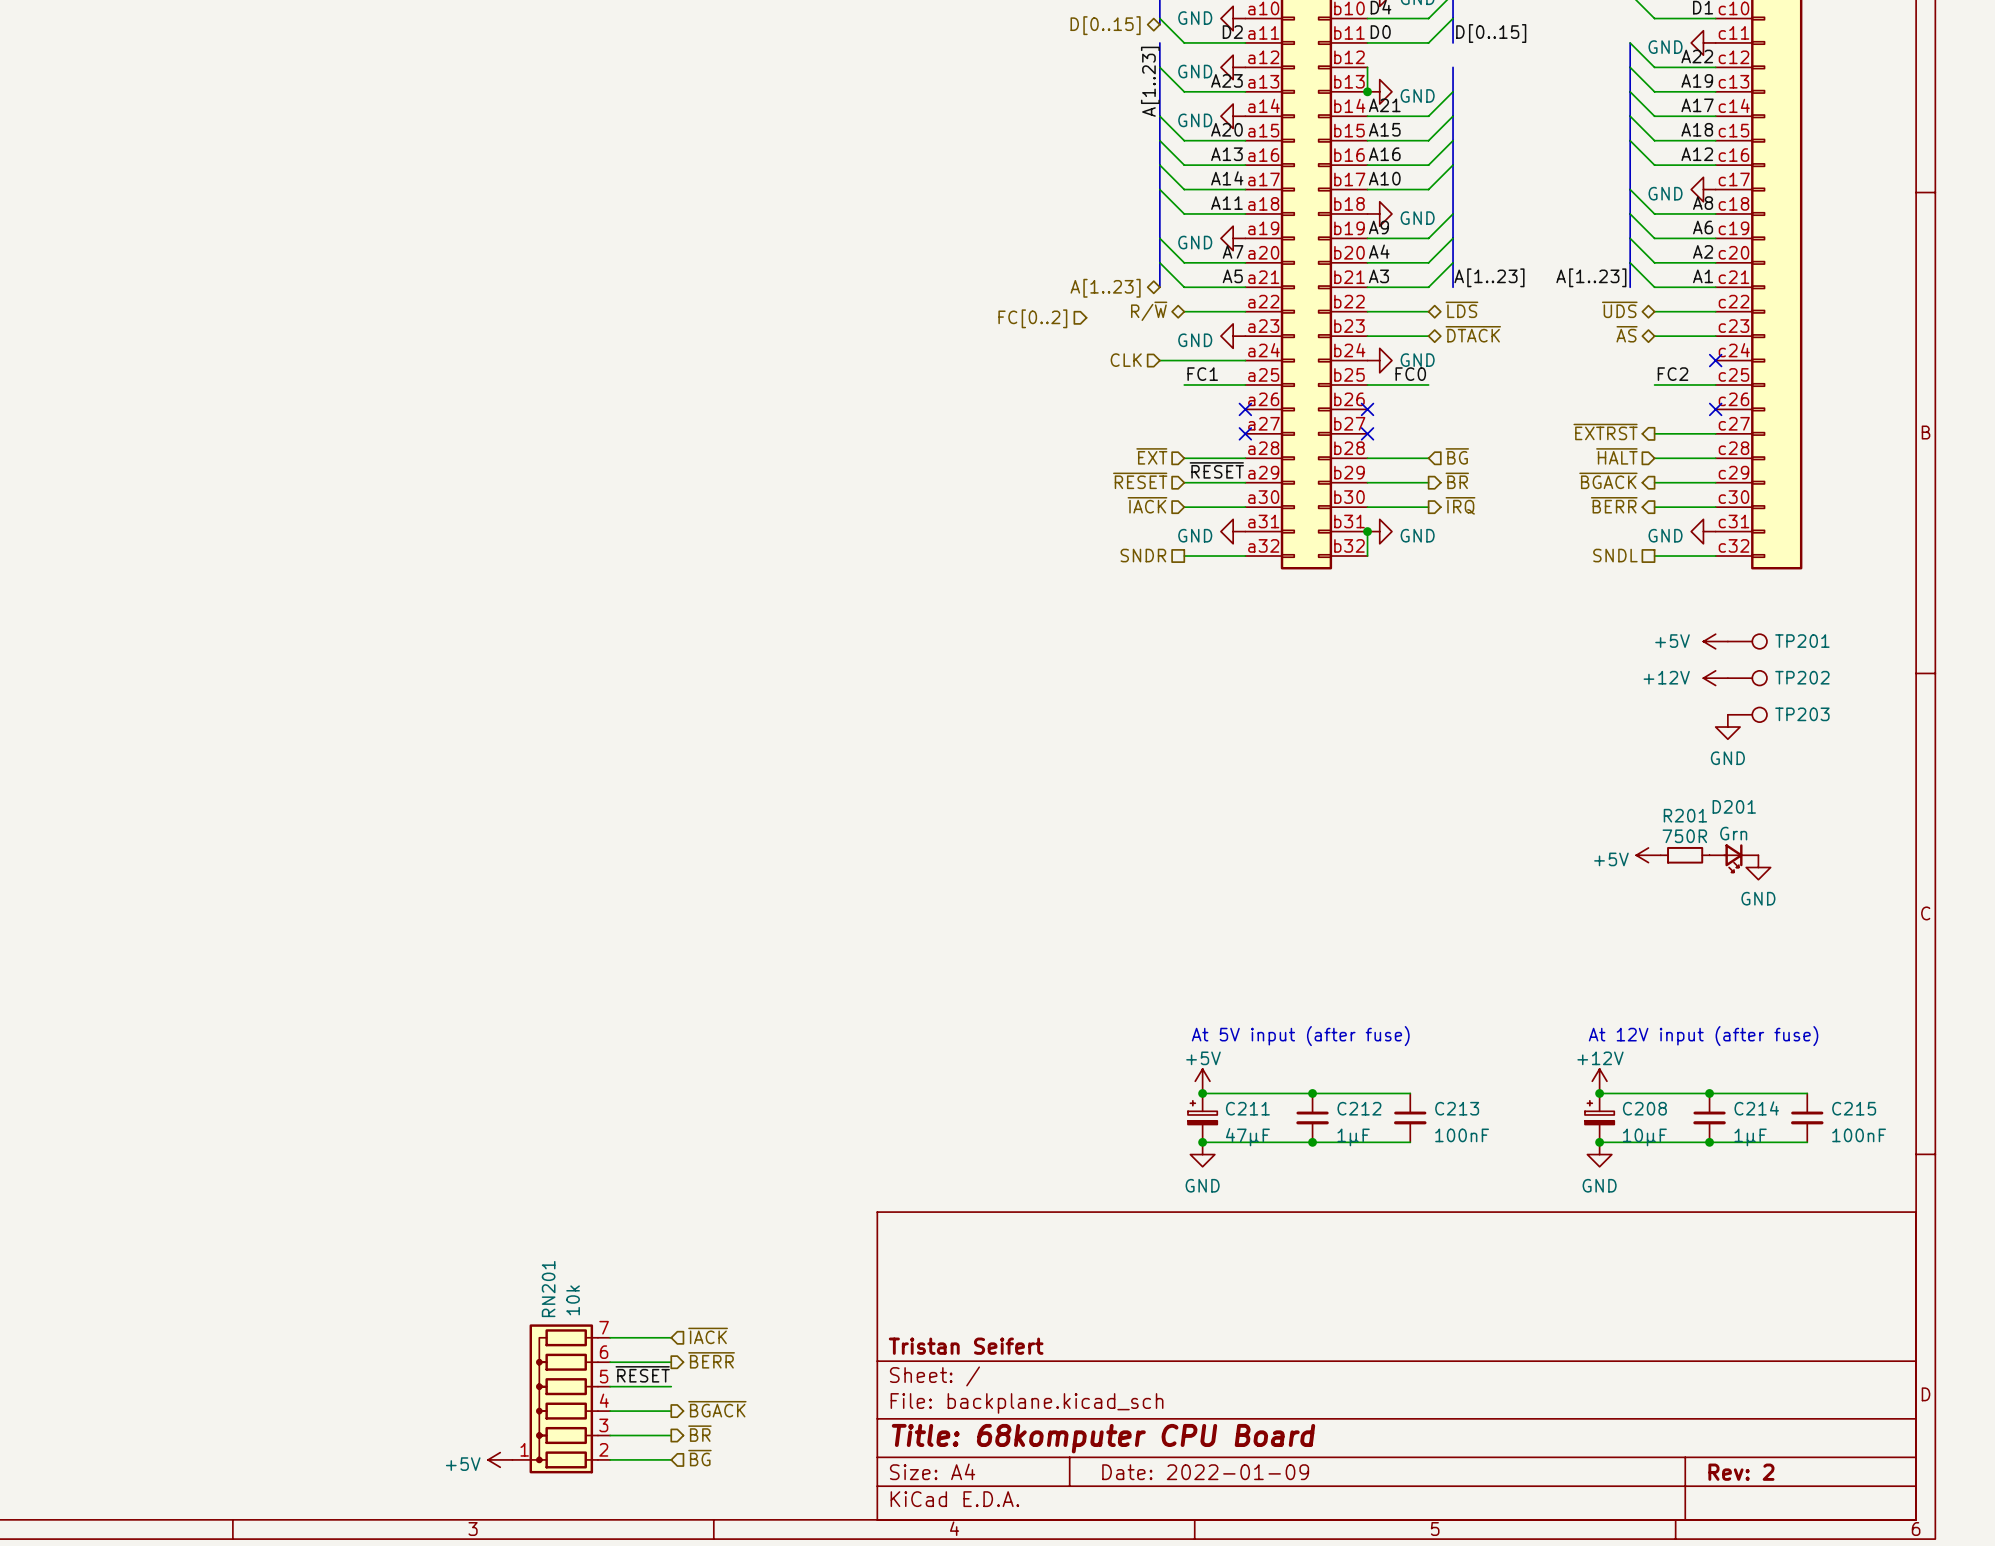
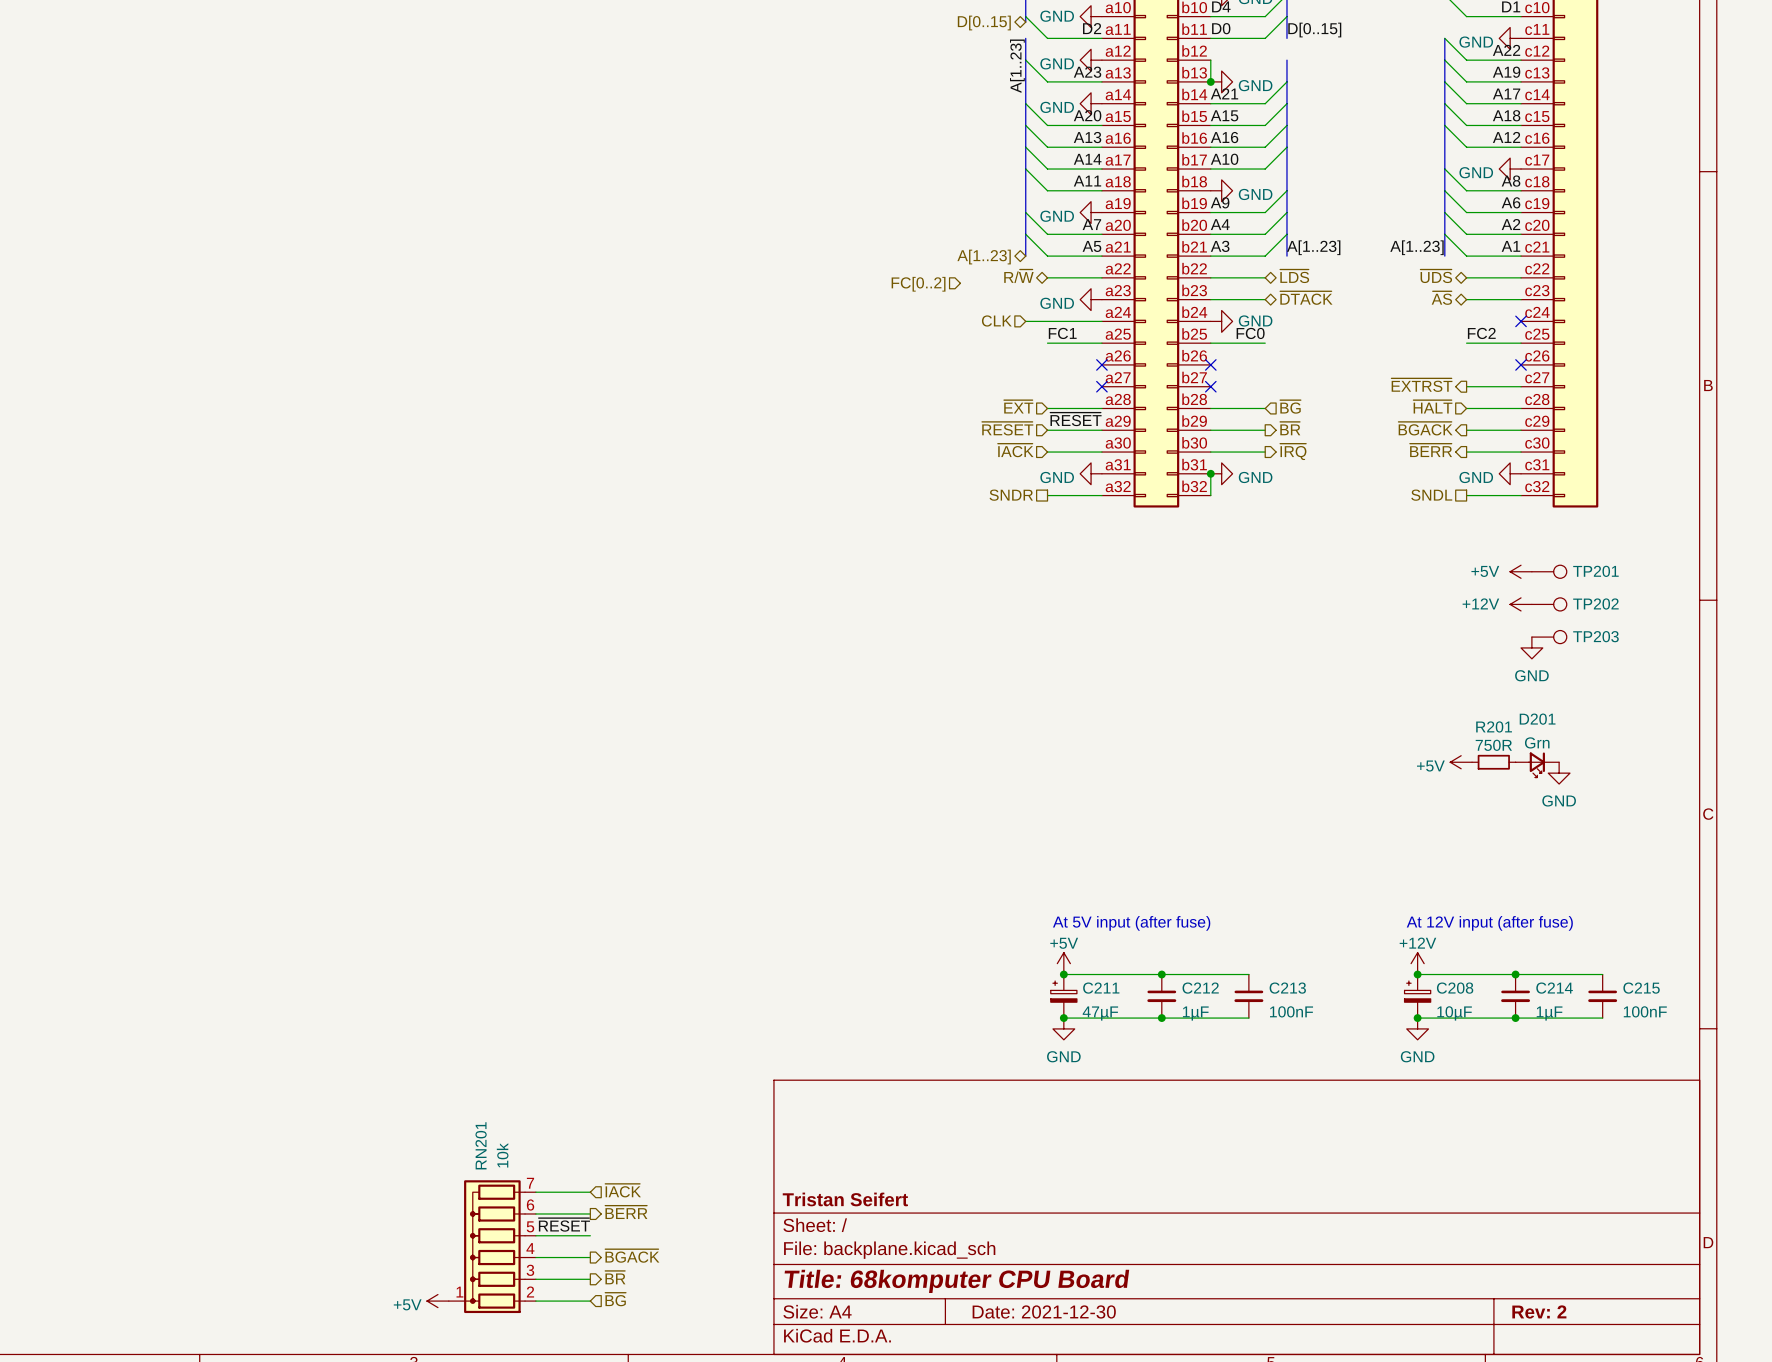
title block: Date: 2022-01-09 (1205, 1472) -> Date: 2021-12-30 (1044, 1311)

